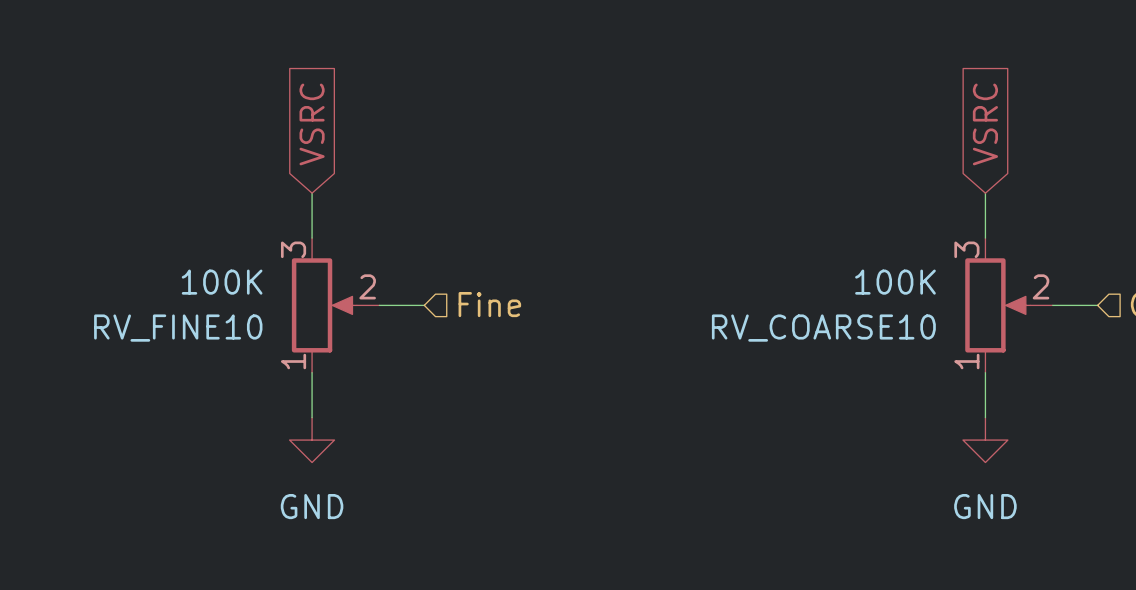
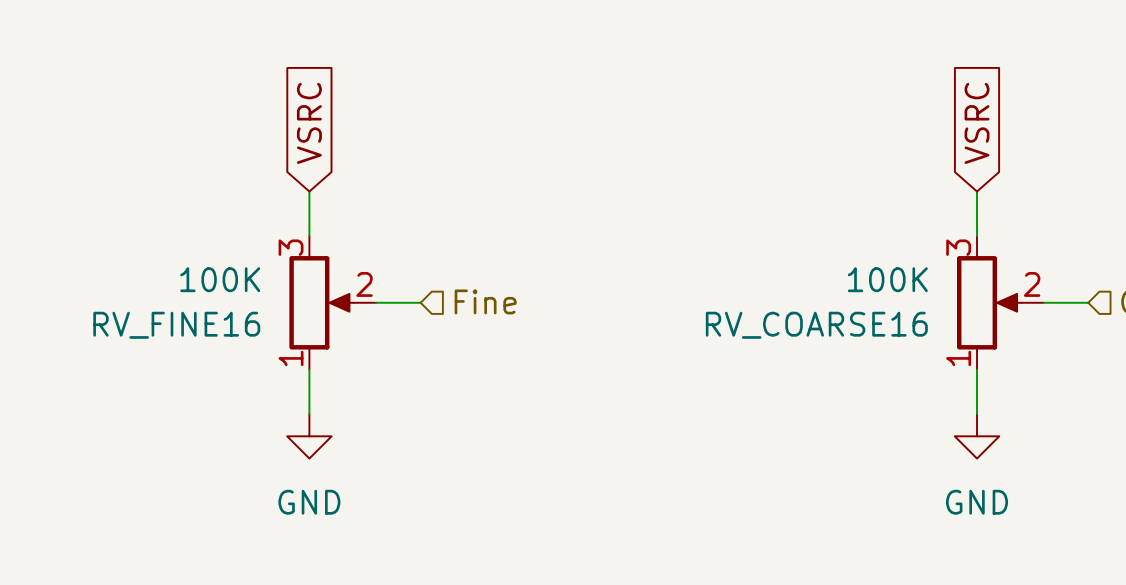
RV_FINE10 name: RV_FINE10 (178, 328) -> RV_FINE16 (176, 325)
RV_COARSE10 name: RV_COARSE10 (823, 328) -> RV_COARSE16 (816, 325)

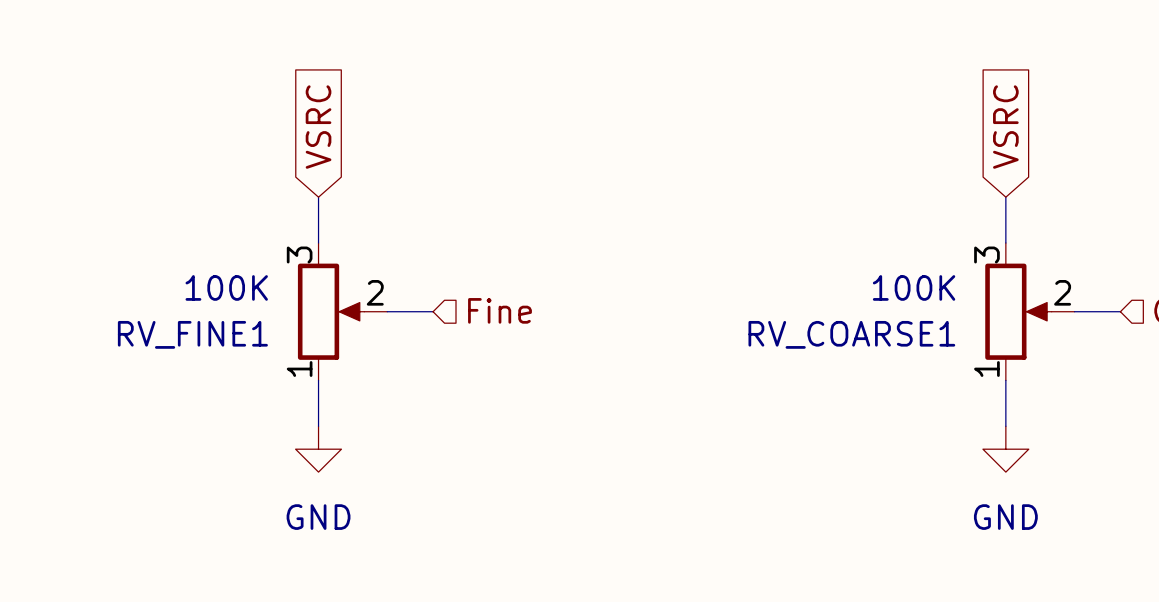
RV_FINE16 name: RV_FINE16 (176, 325) -> RV_FINE1 (192, 334)
RV_COARSE16 name: RV_COARSE16 (816, 325) -> RV_COARSE1 (851, 334)

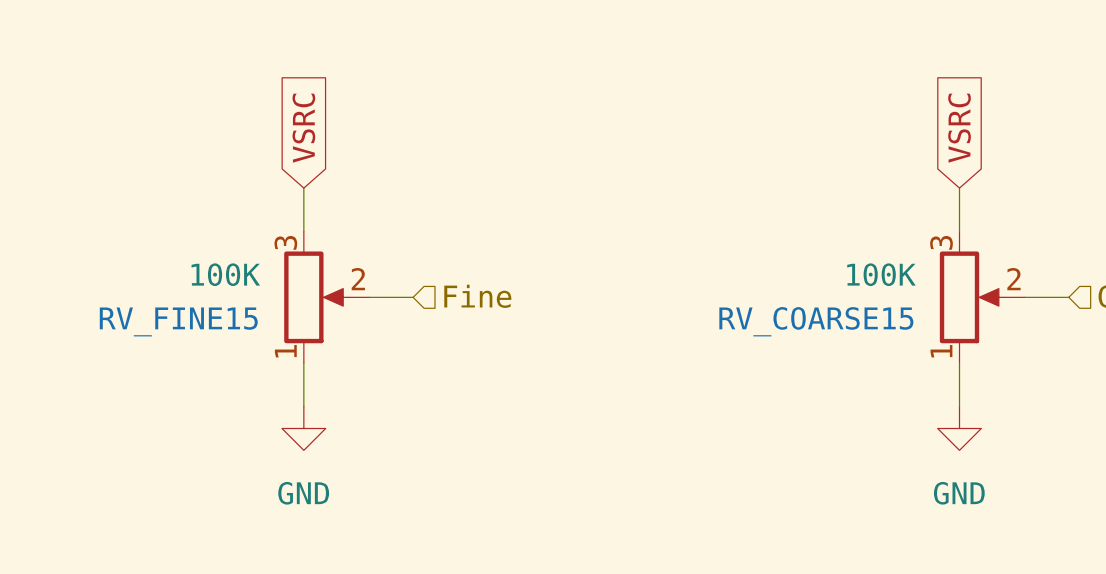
RV_FINE1 name: RV_FINE1 (192, 334) -> RV_FINE15 (178, 321)
RV_COARSE1 name: RV_COARSE1 (851, 334) -> RV_COARSE15 (816, 321)

